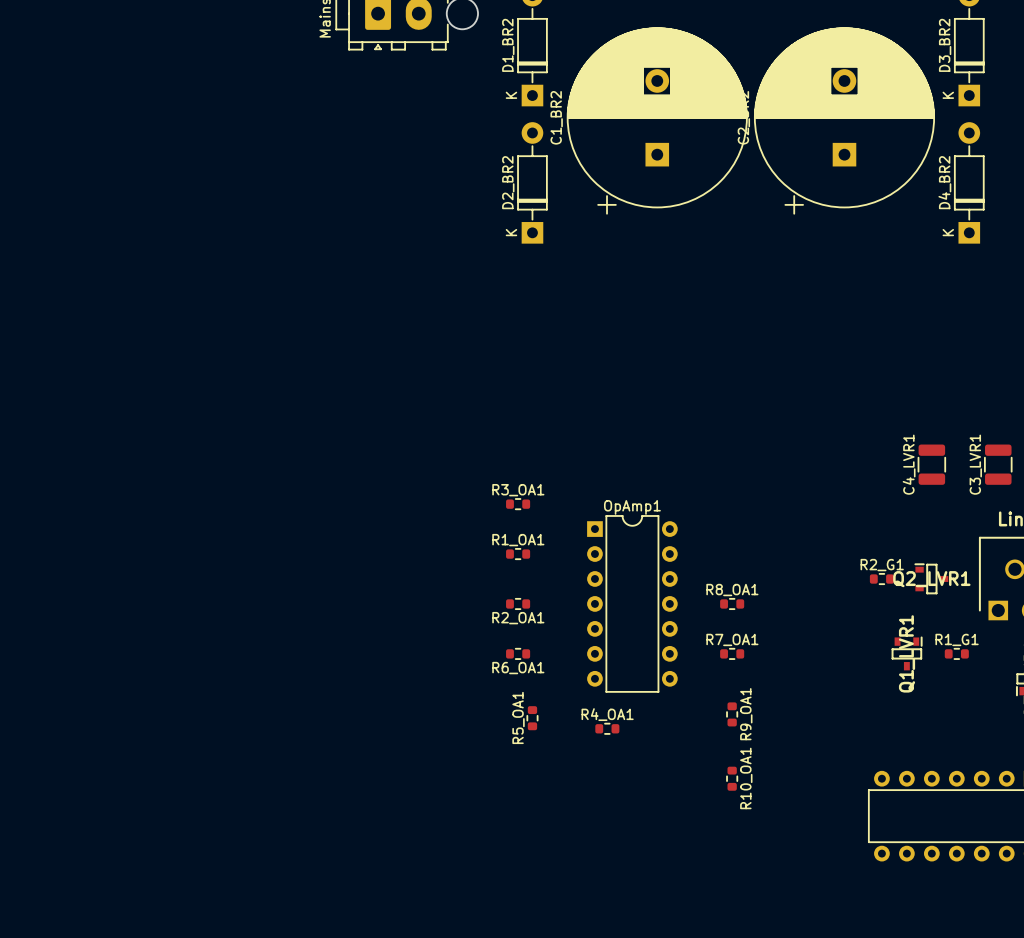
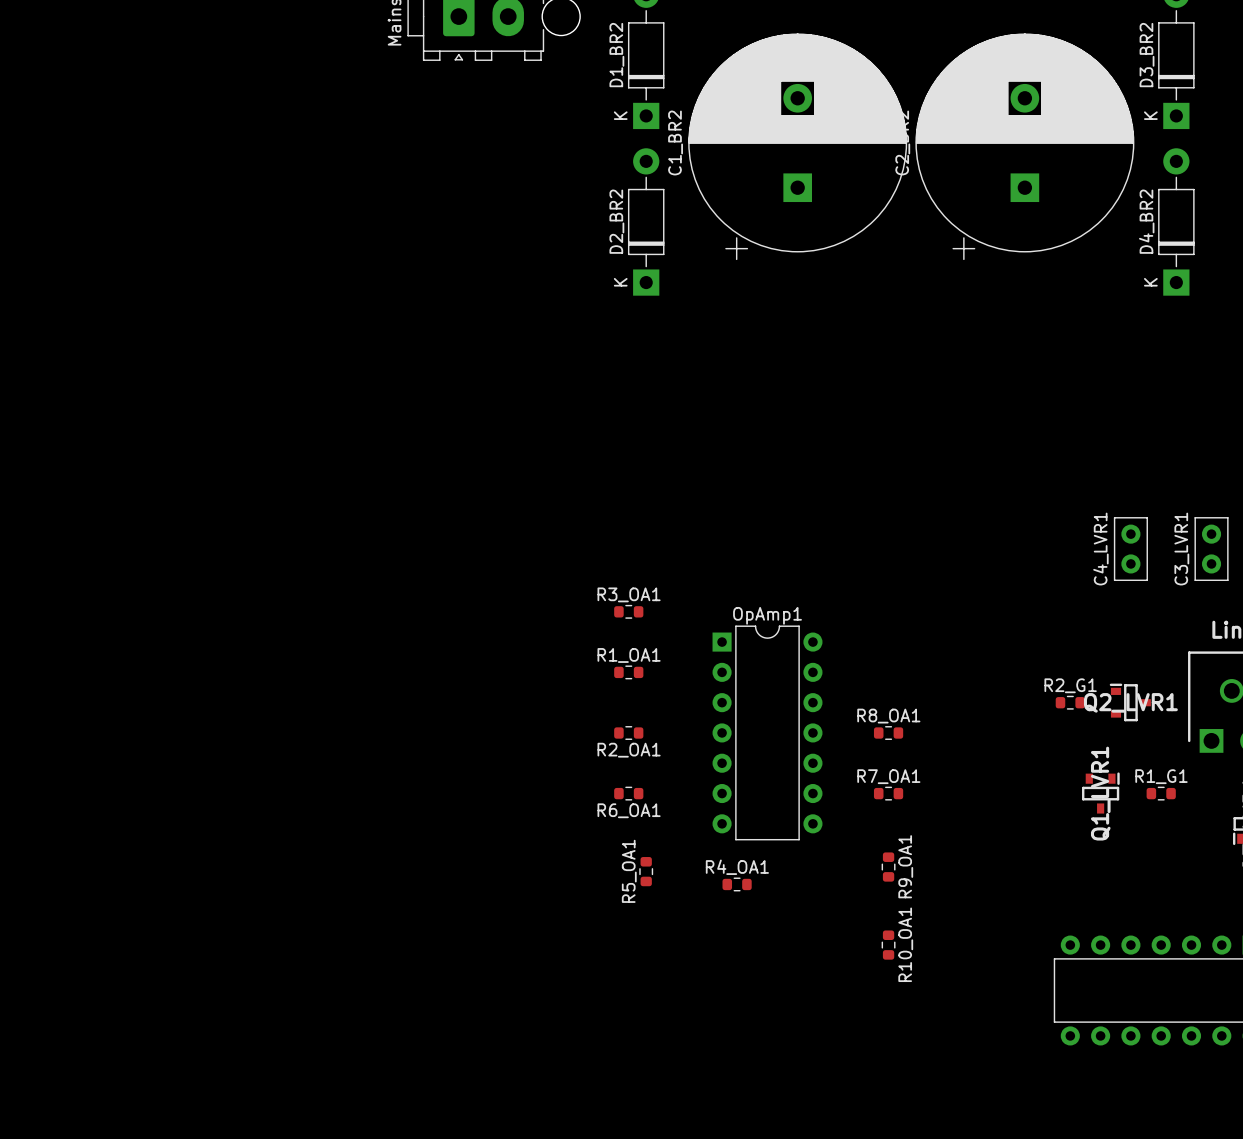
C4_LVR1 footprint: [917, 444, 946, 485] -> [1113, 517, 1148, 582]
C3_LVR1 footprint: [984, 444, 1013, 485] -> [1194, 517, 1229, 582]

